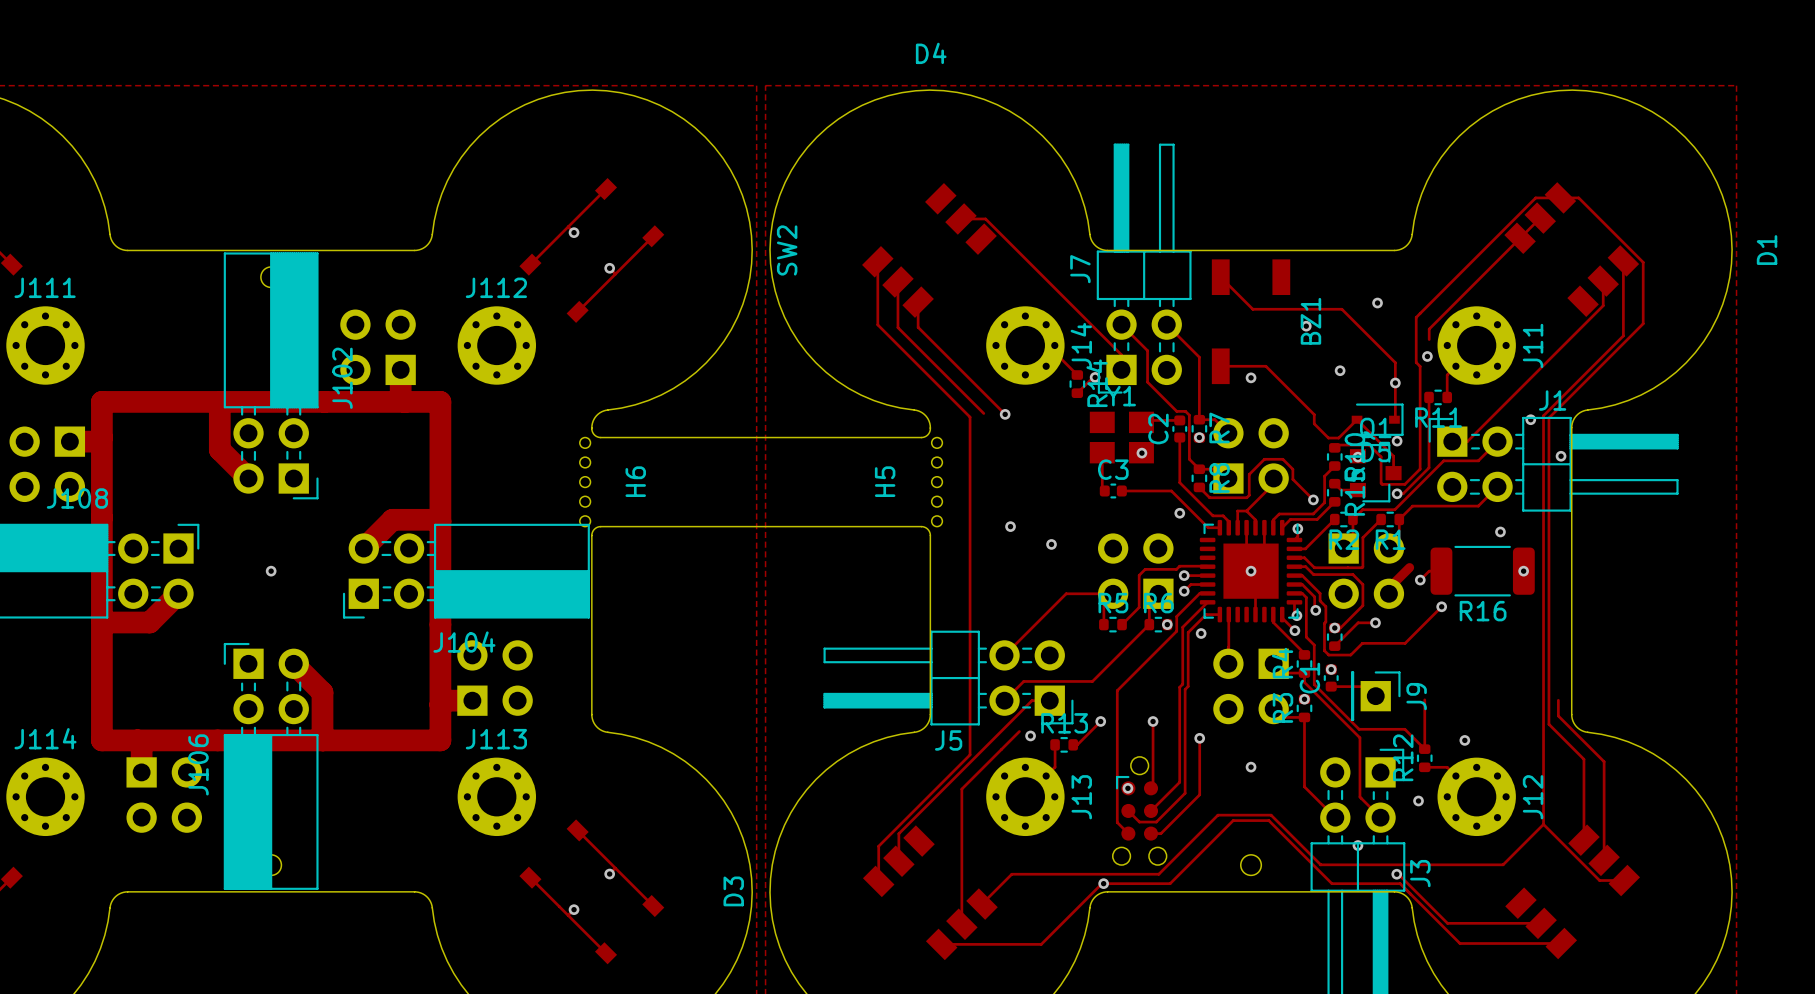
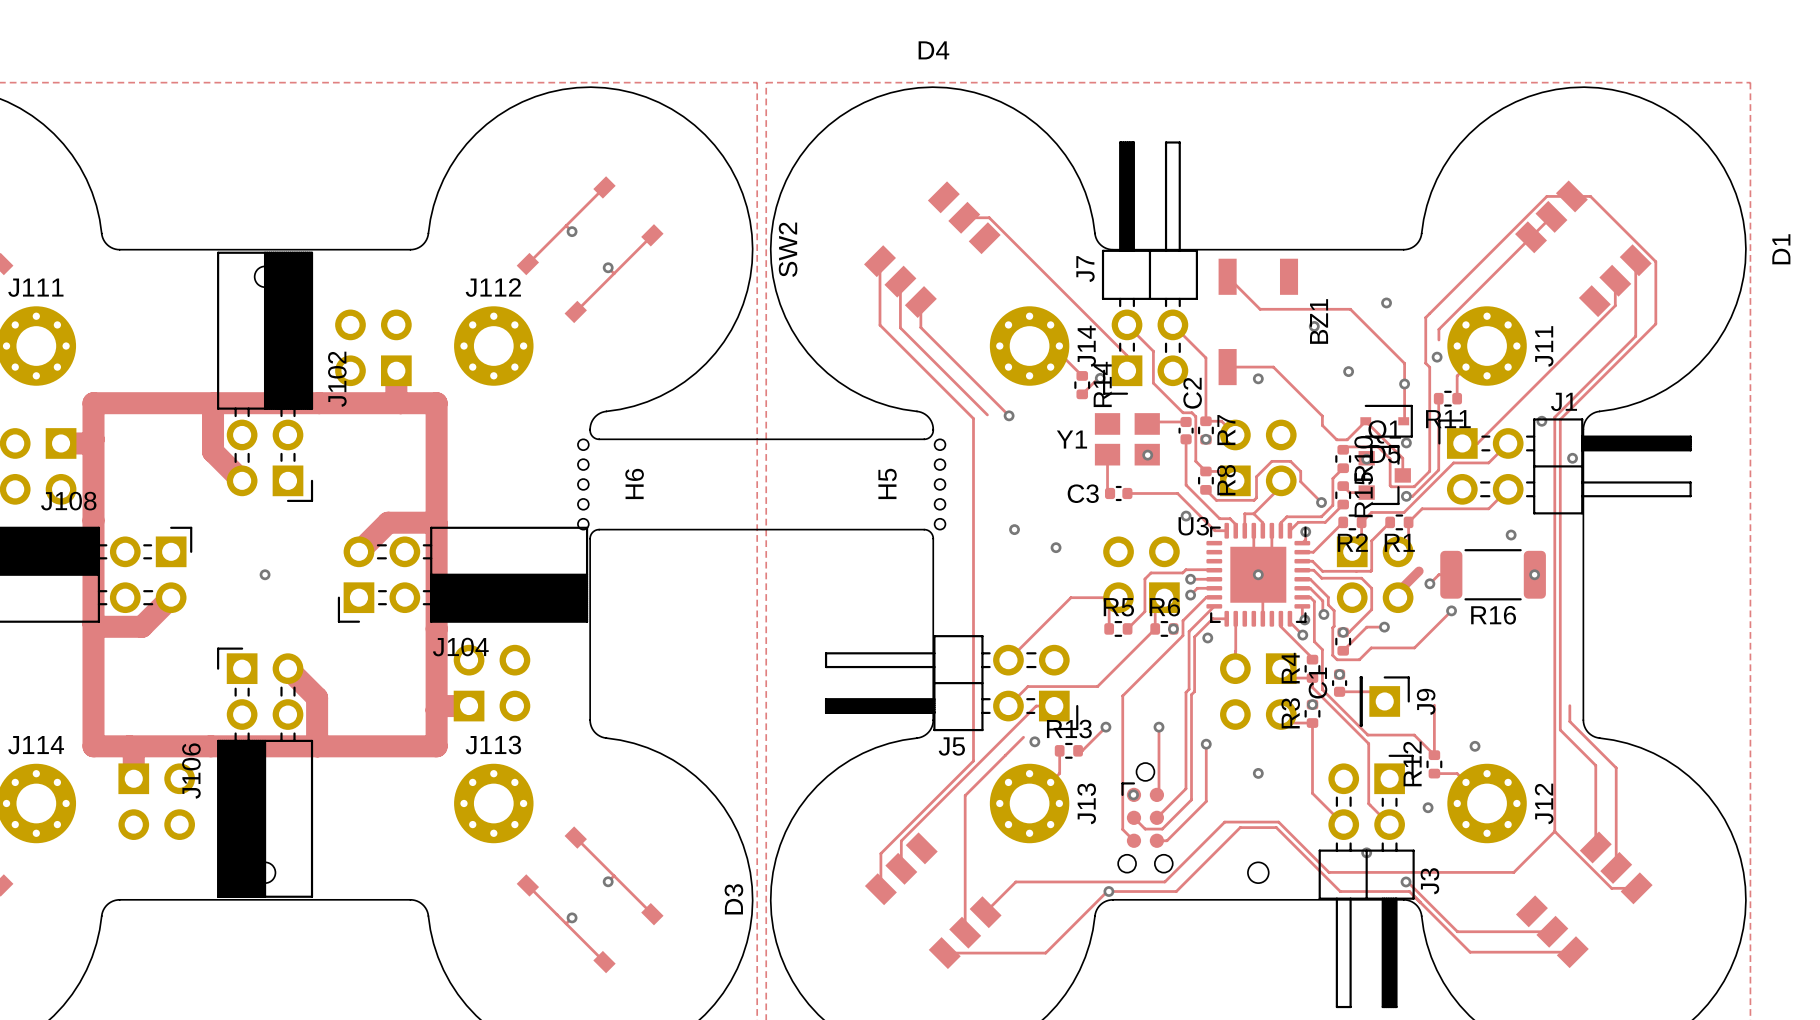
Y1 name position: Y1 (1121, 396) -> Y1 (1071, 439)
C2 name position: C2 (1158, 428) -> C2 (1192, 393)
C3 name position: C3 (1113, 469) -> C3 (1083, 493)
U3 name: none -> U3 (1193, 526)

